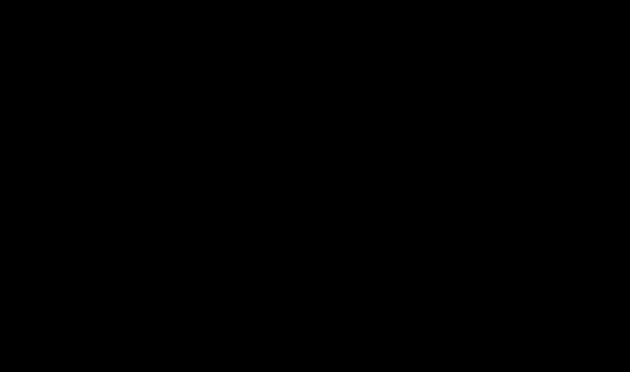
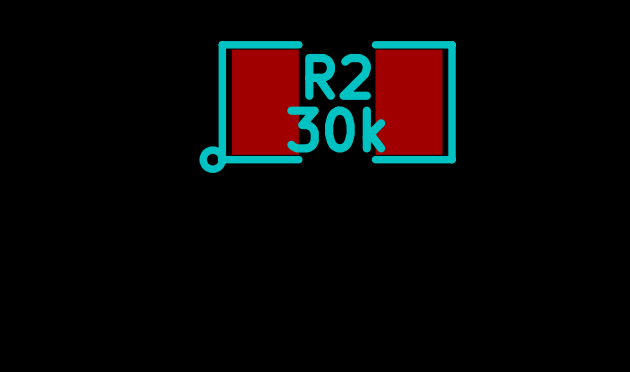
R2: none -> 30k (327, 107)

